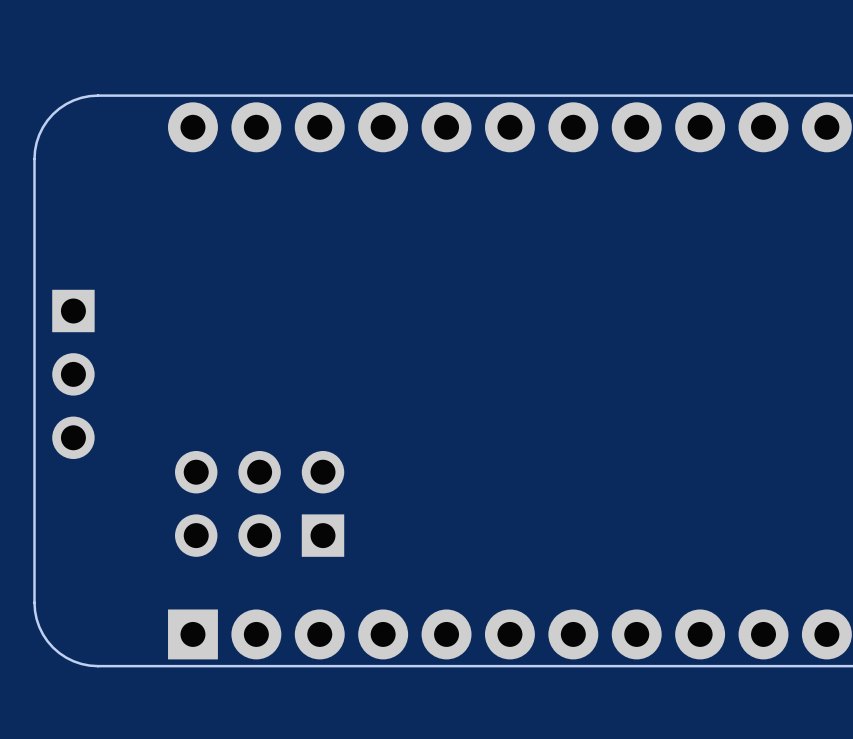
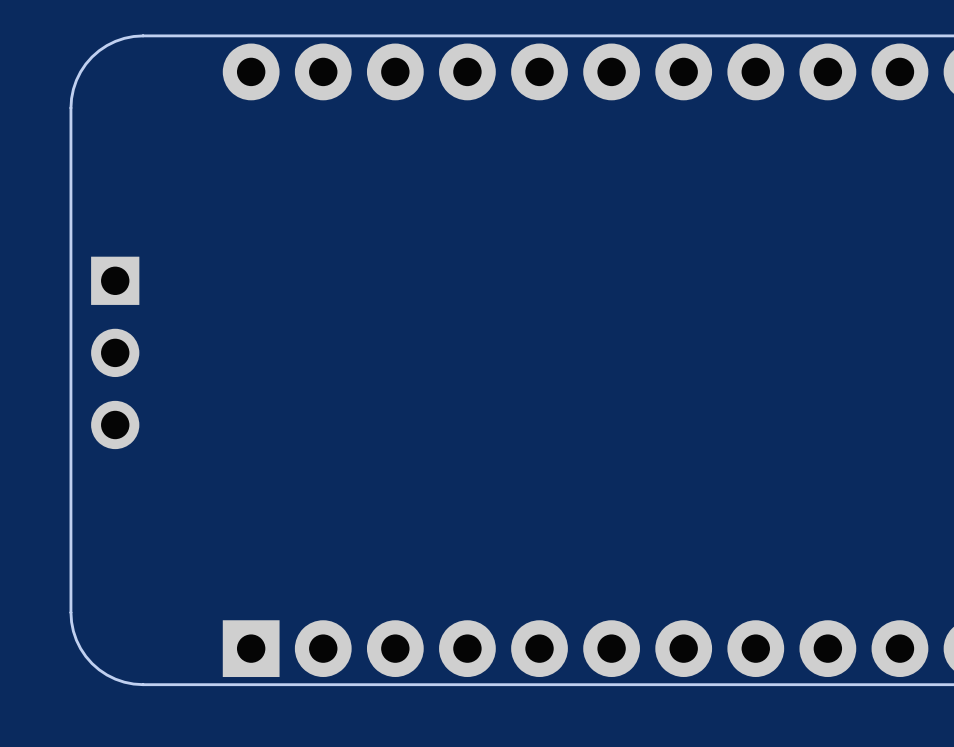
part: (259, 503) -> none

